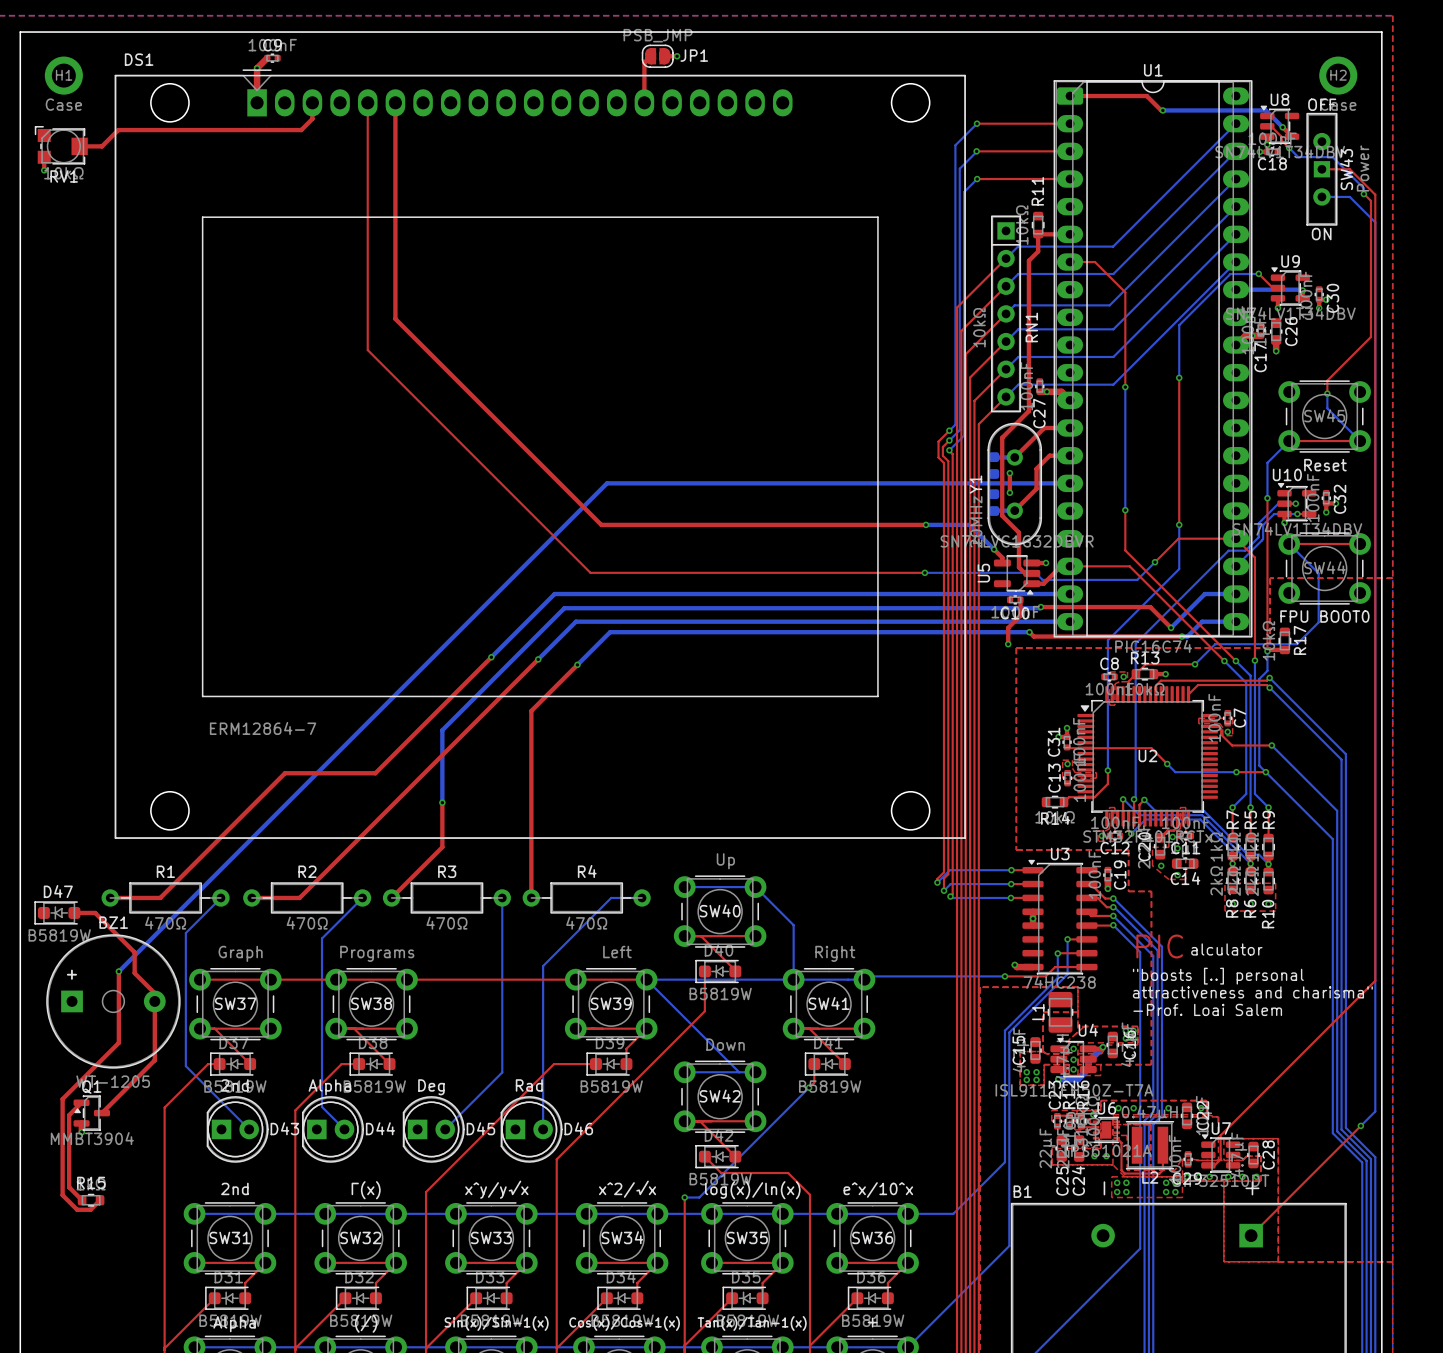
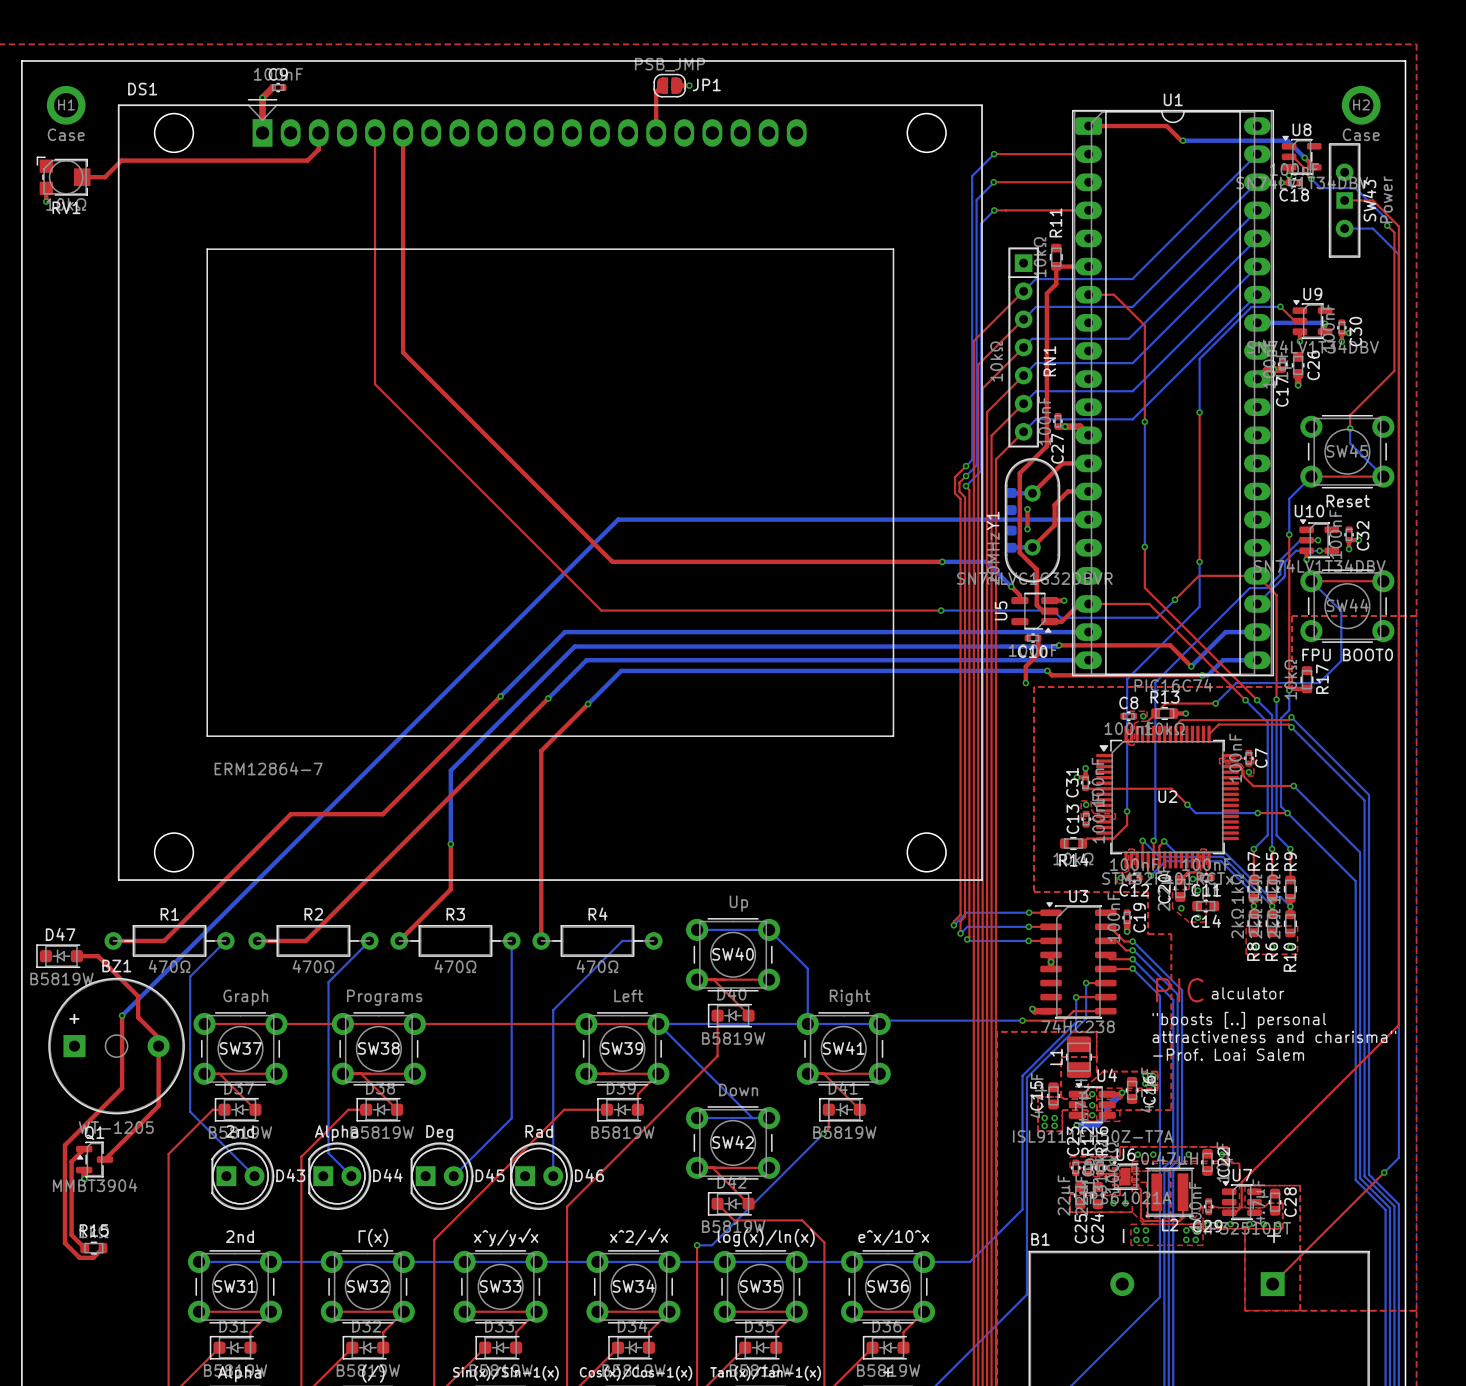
text: OFF (1322, 104) -> none
text: ON (1321, 234) -> none

